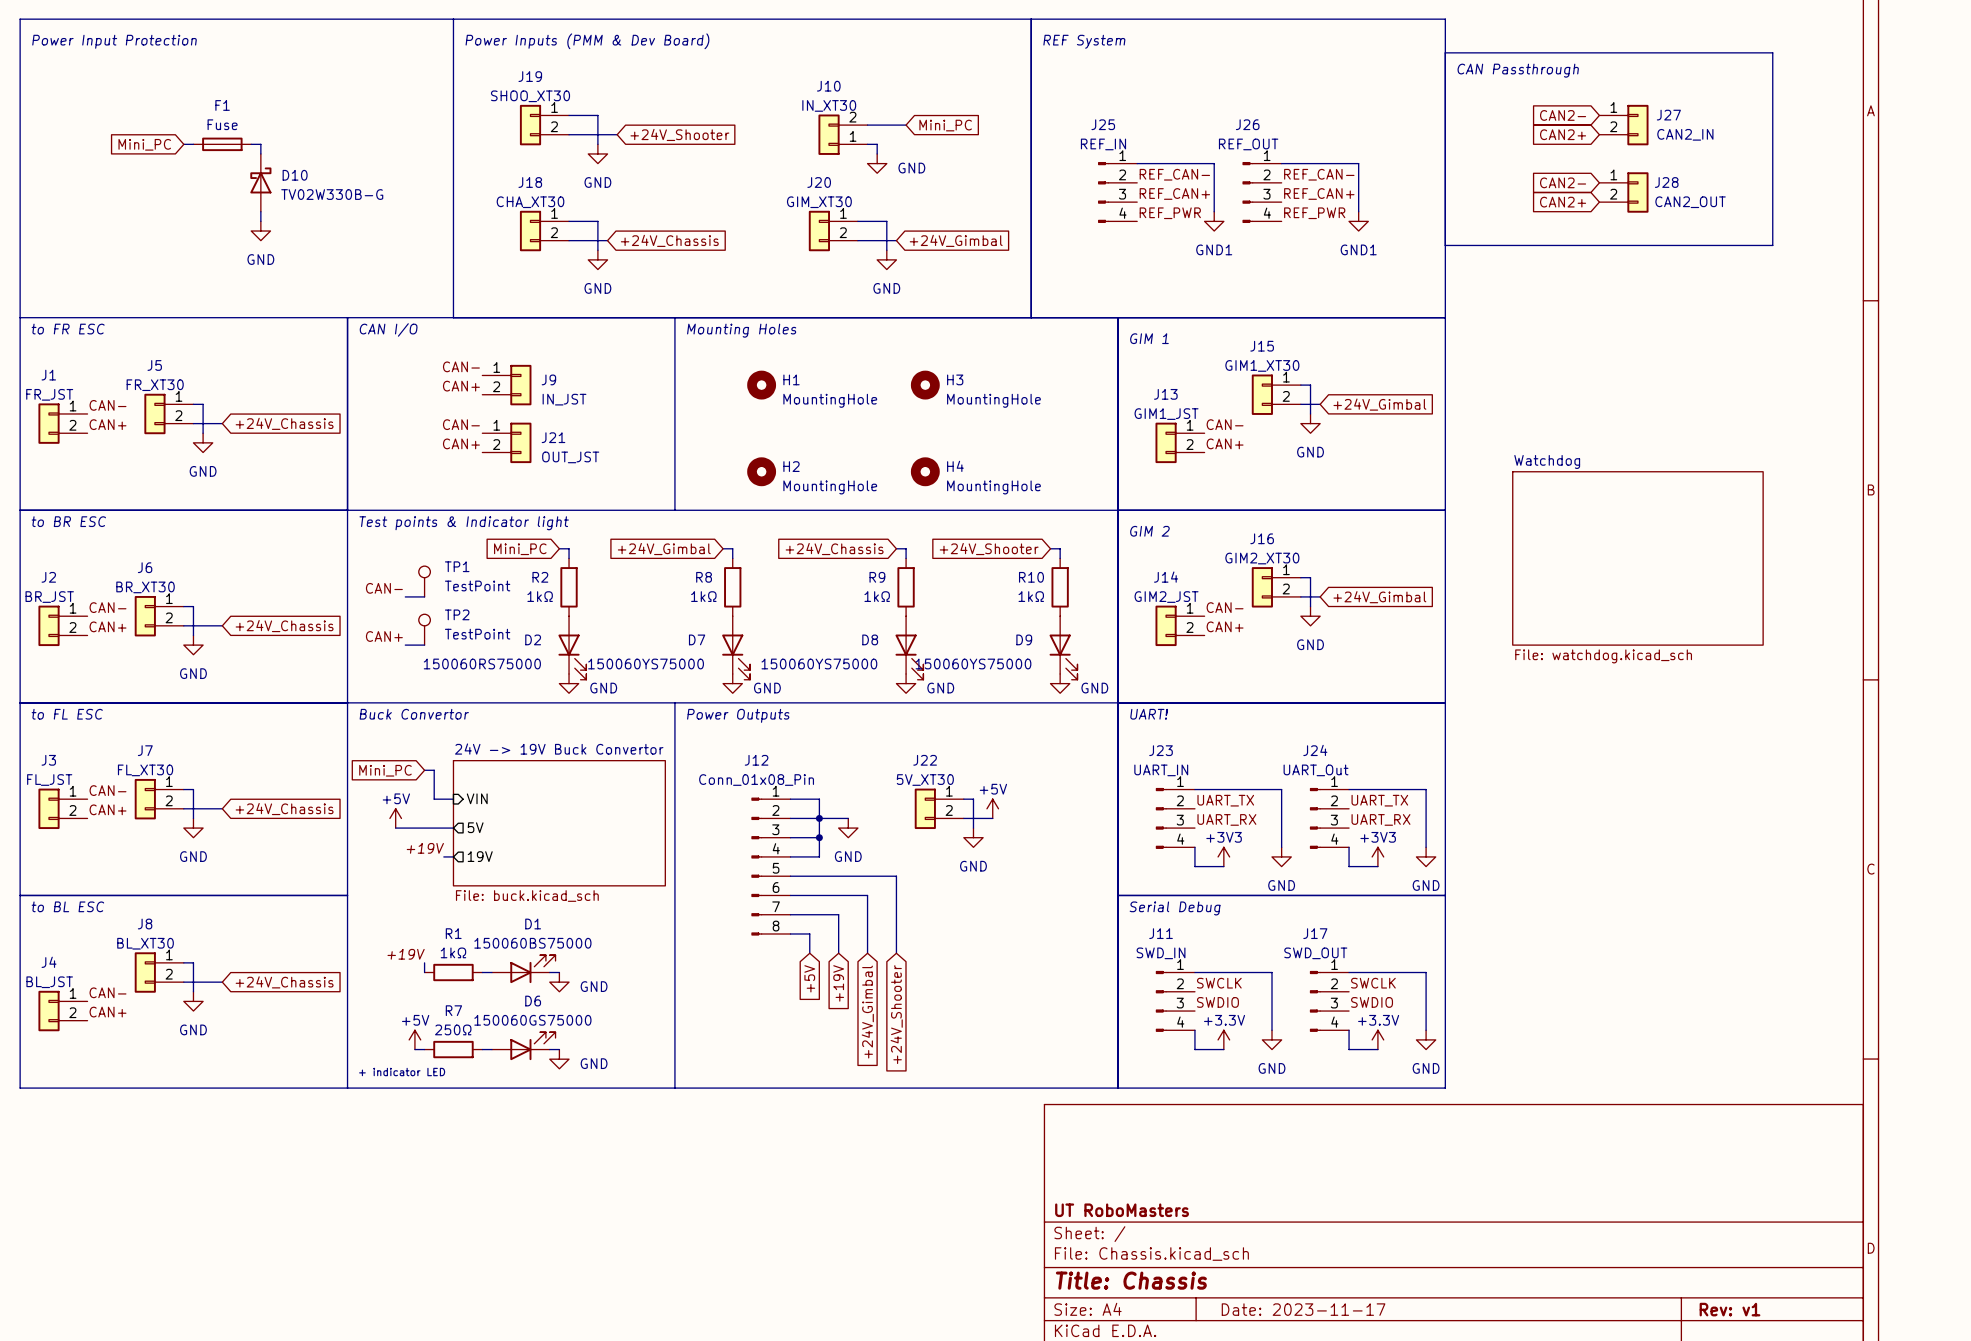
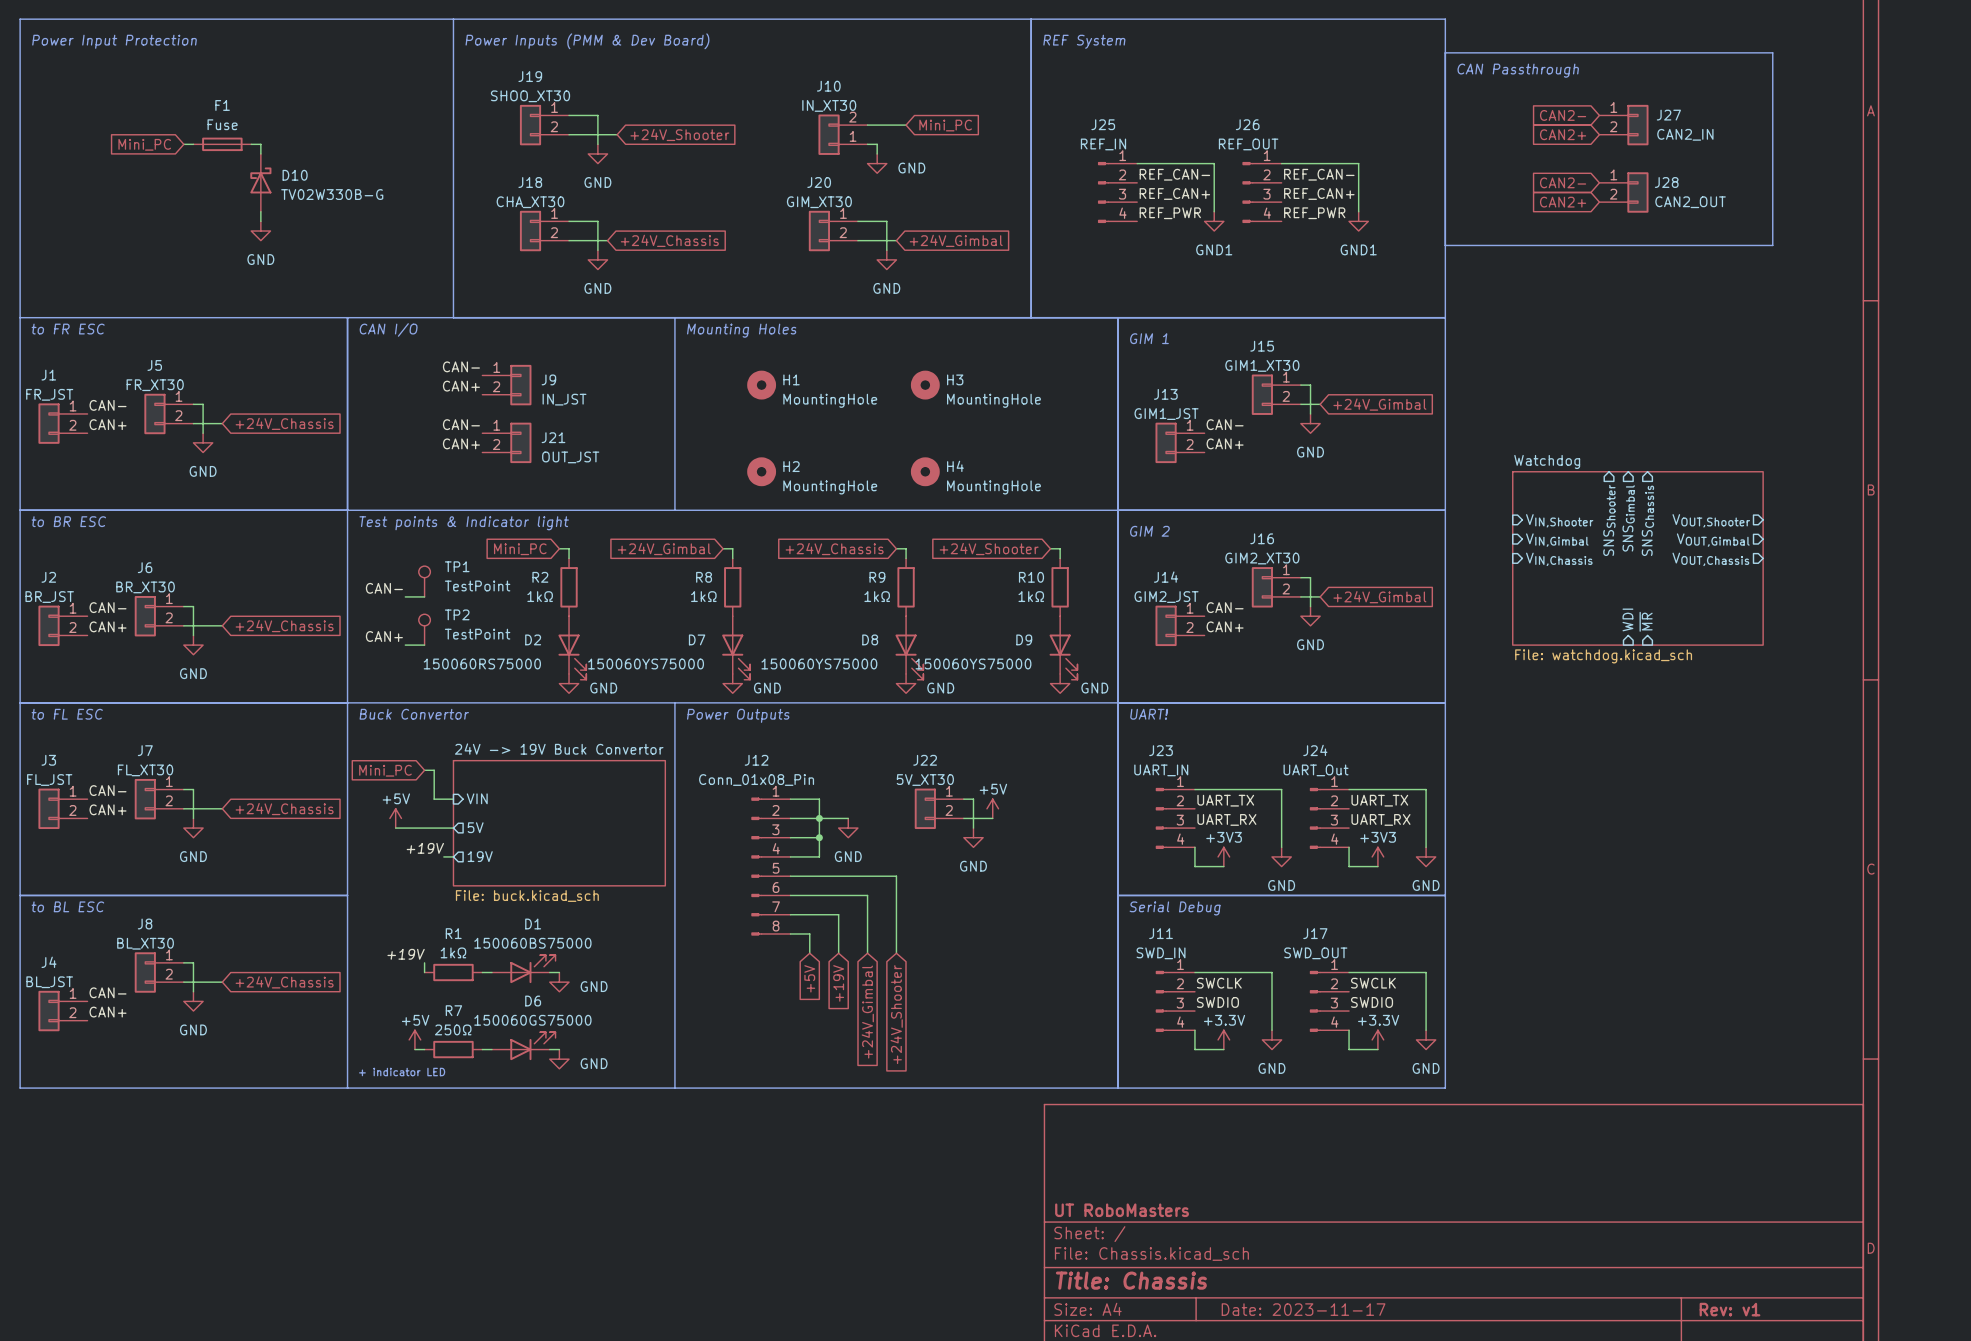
sheet pin: none -> SNSGimbal (1628, 518)
sheet pin: none -> VIN,Shooter (1559, 520)
sheet pin: none -> SNSShooter (1609, 520)
sheet pin: none -> SNSChassis (1647, 520)
sheet pin: none -> VOUT,Shooter (1711, 520)
sheet pin: none -> VIN,Gimbal (1557, 540)
sheet pin: none -> VOUT,Gimbal (1713, 540)
sheet pin: none -> VIN,Chassis (1559, 559)
sheet pin: none -> VOUT,Chassis (1710, 559)
sheet pin: none -> WDI (1627, 619)
sheet pin: none -> ~{MR} (1646, 621)

